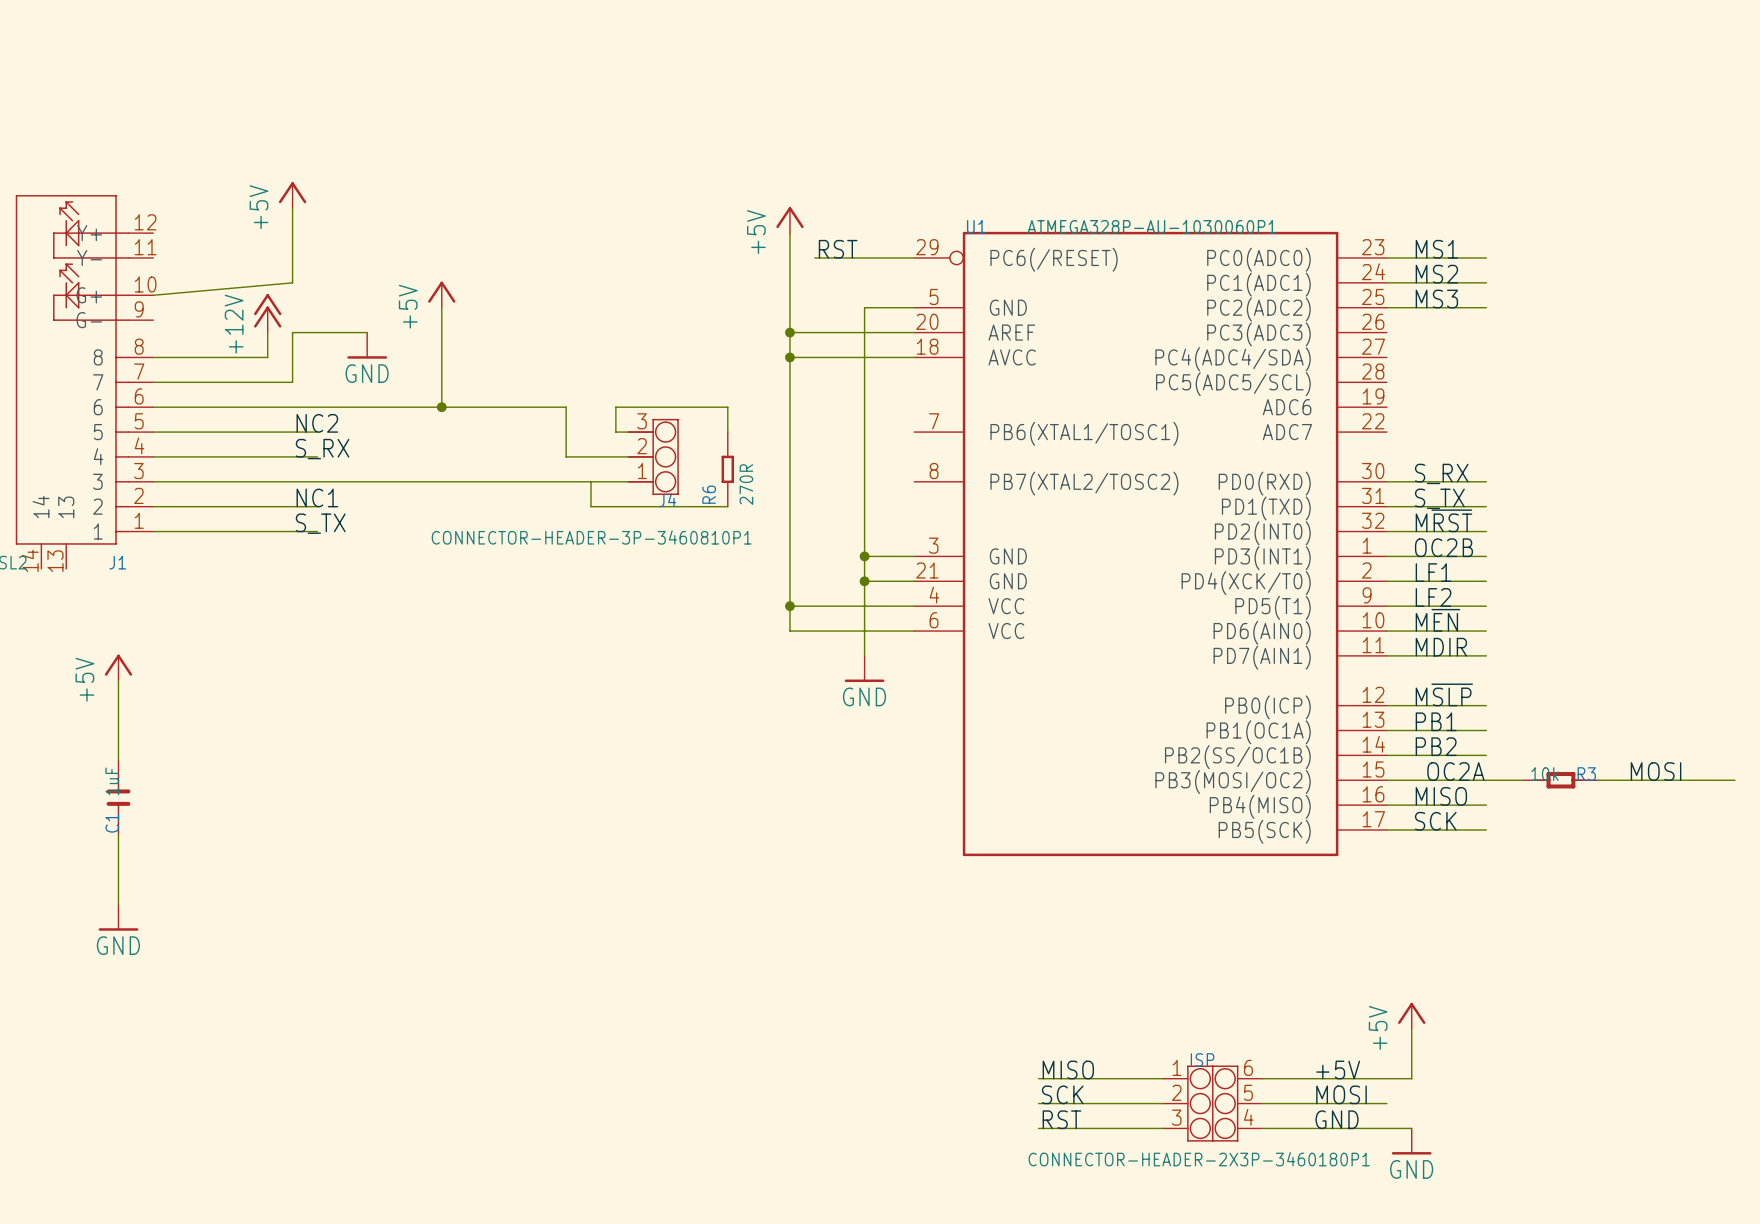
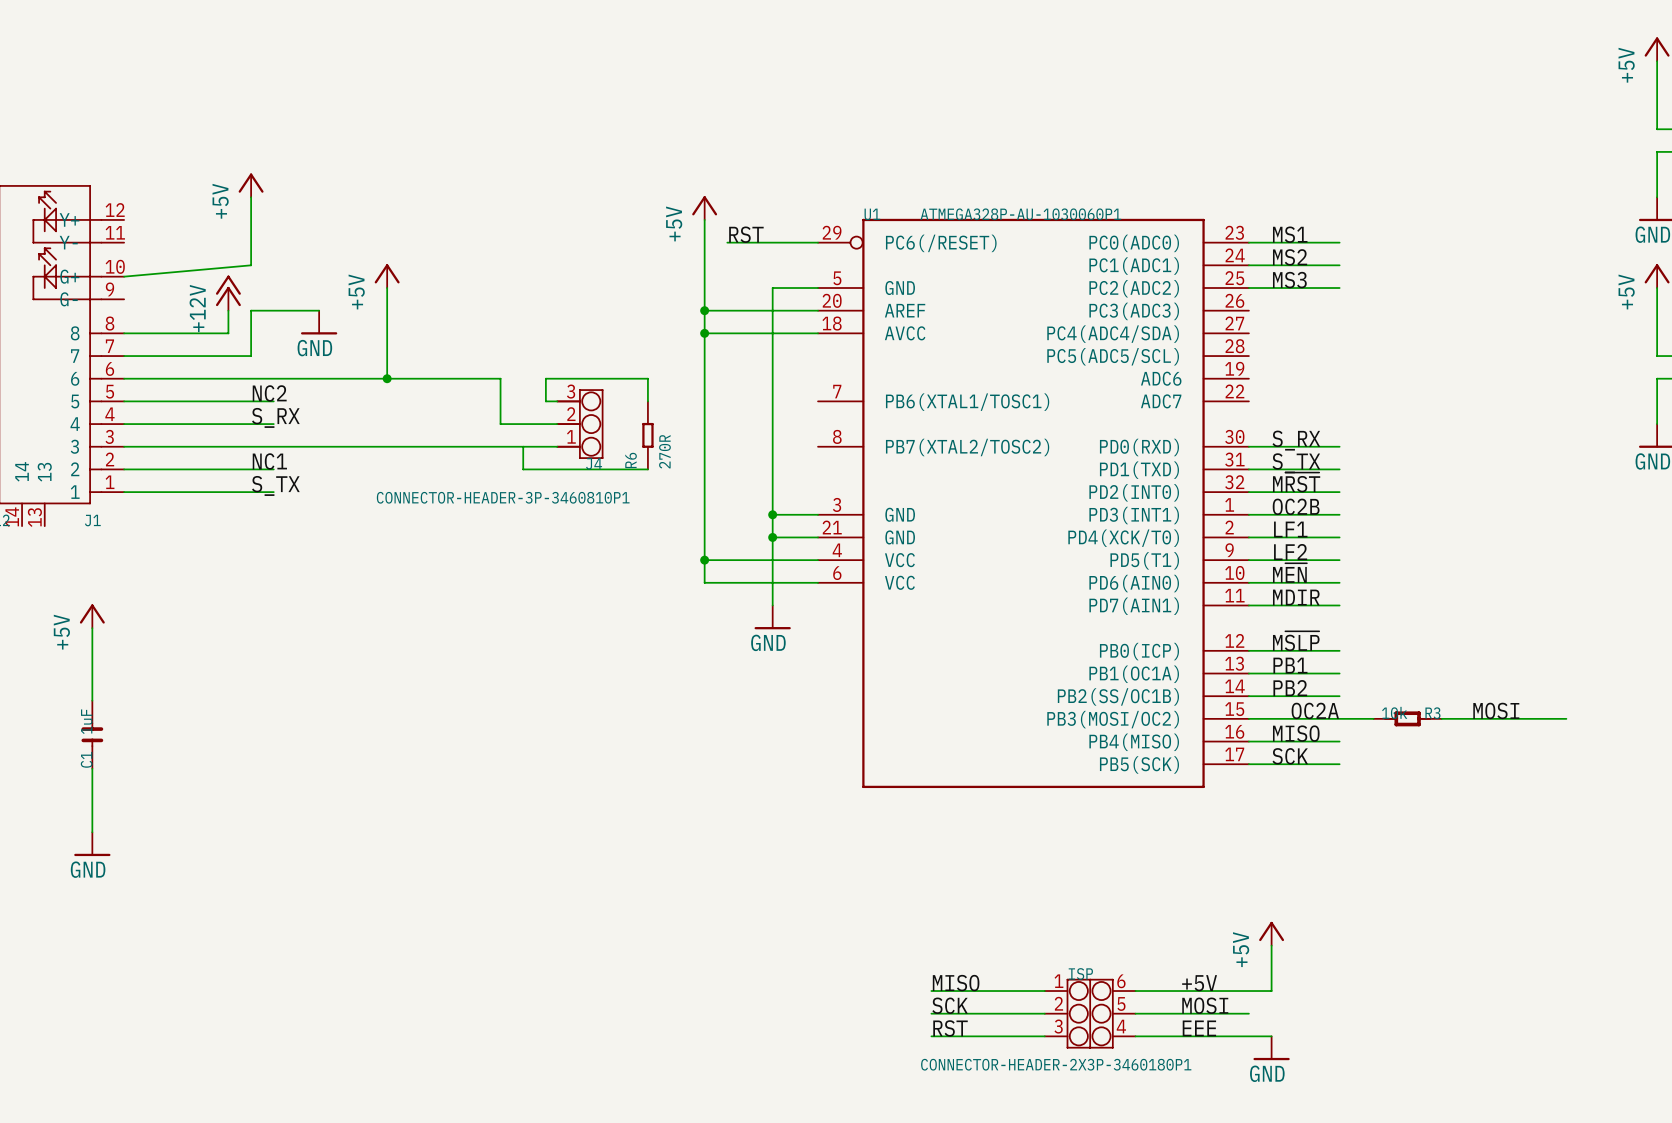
label: GND (1337, 1119) -> EEE (1199, 1028)

